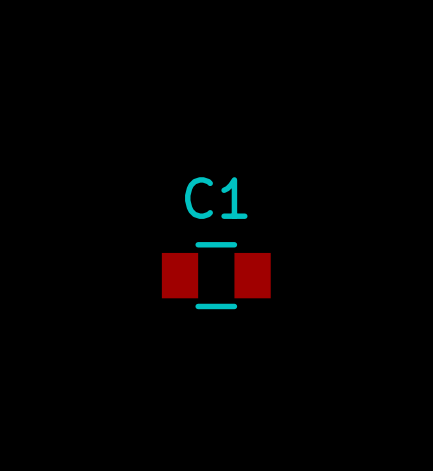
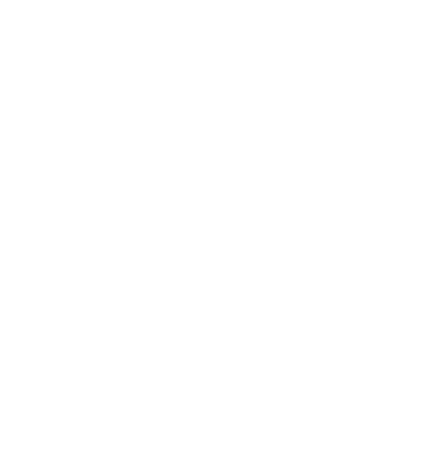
C1: (216, 275) -> none

